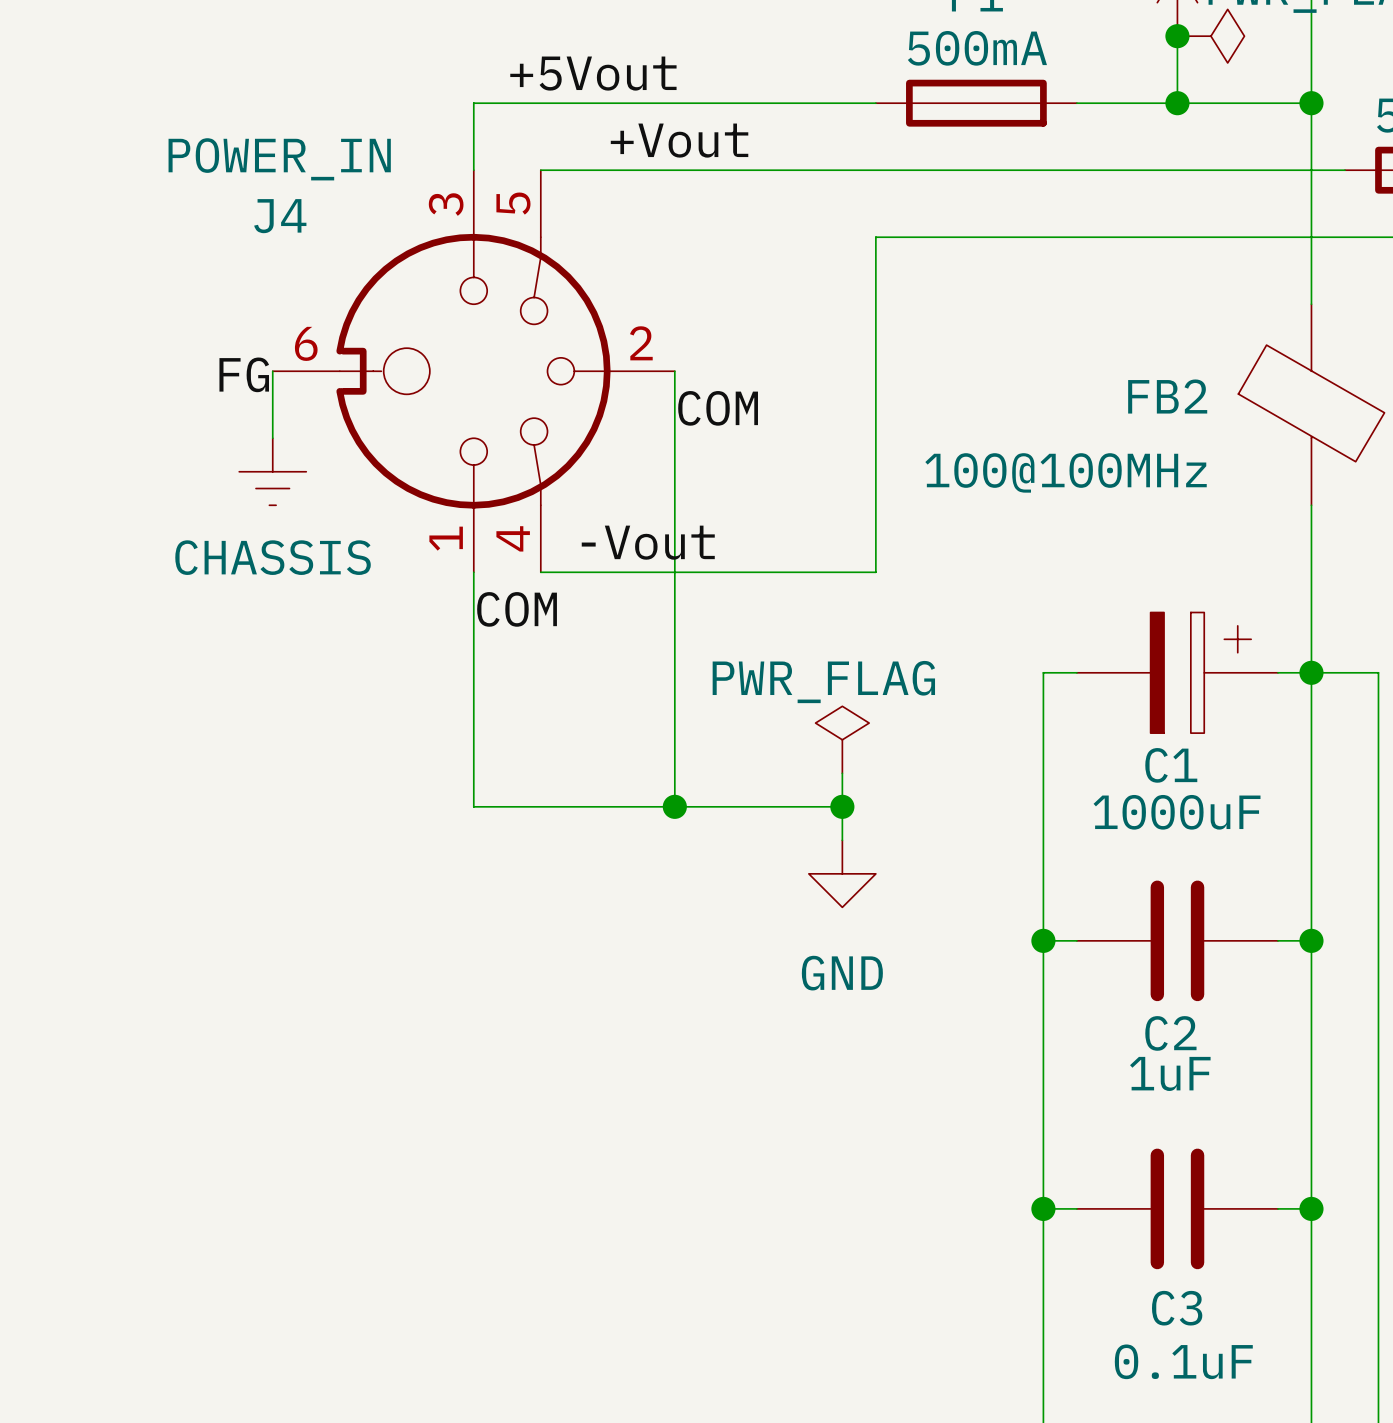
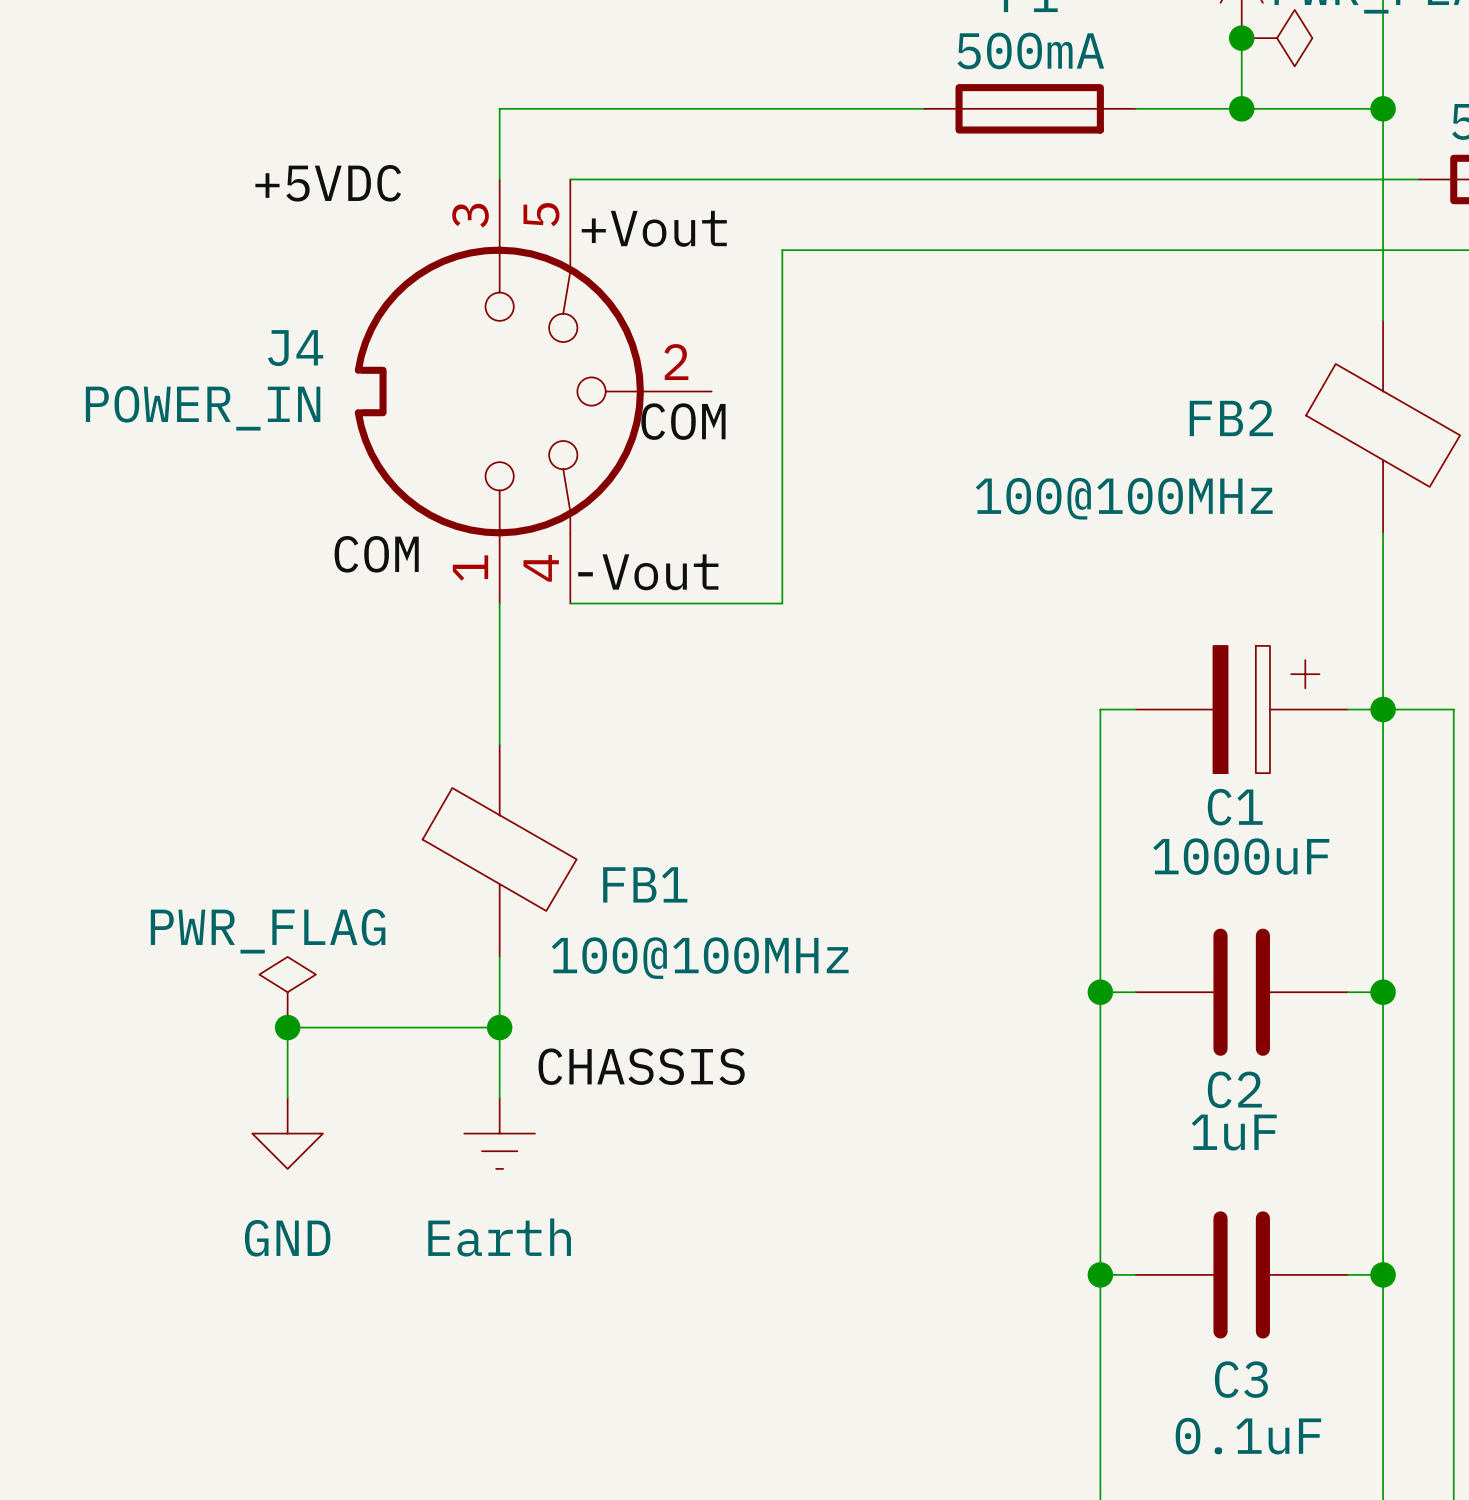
label: +5Vout (593, 73) -> none
label position: +Vout (679, 140) -> +Vout (654, 228)
J4 value position: POWER_IN (279, 159) -> POWER_IN (203, 408)
J4 symbol: [272, 170, 675, 573] -> [354, 179, 712, 604]
label: none -> +5VDC (328, 183)
J4 name position: J4 (280, 216) -> J4 (295, 348)
wire: (875, 237) (875, 572) (741, 572) -> (923, 250) (782, 250) (782, 603)
wire: (272, 371) (272, 438) -> none
wire: (674, 371) (674, 806) -> none
label: FG (244, 374) -> none
label position: COM (718, 408) -> COM (683, 421)
power symbol: CHASSIS (272, 471) -> none
label: none -> COM (376, 554)
label position: -Vout (648, 542) -> -Vout (648, 572)
label: COM (517, 609) -> none
wire: (473, 706) (473, 806) (842, 806) -> none
power symbol position: PWR_FLAG (842, 739) -> PWR_FLAG (287, 992)
wire: (842, 773) (842, 840) -> none
FB1: none -> 100@100MHz (499, 850)
junction: (674, 806) -> none
junction: (842, 806) -> none
power symbol position: GND (842, 873) -> GND (287, 1133)
wire: none -> (499, 956) (499, 1098)
junction: none -> (287, 1027)
wire: none -> (499, 1027) (287, 1027) (287, 1098)
junction: none -> (499, 1027)
label: none -> CHASSIS (641, 1066)
power symbol: none -> Earth (499, 1133)

